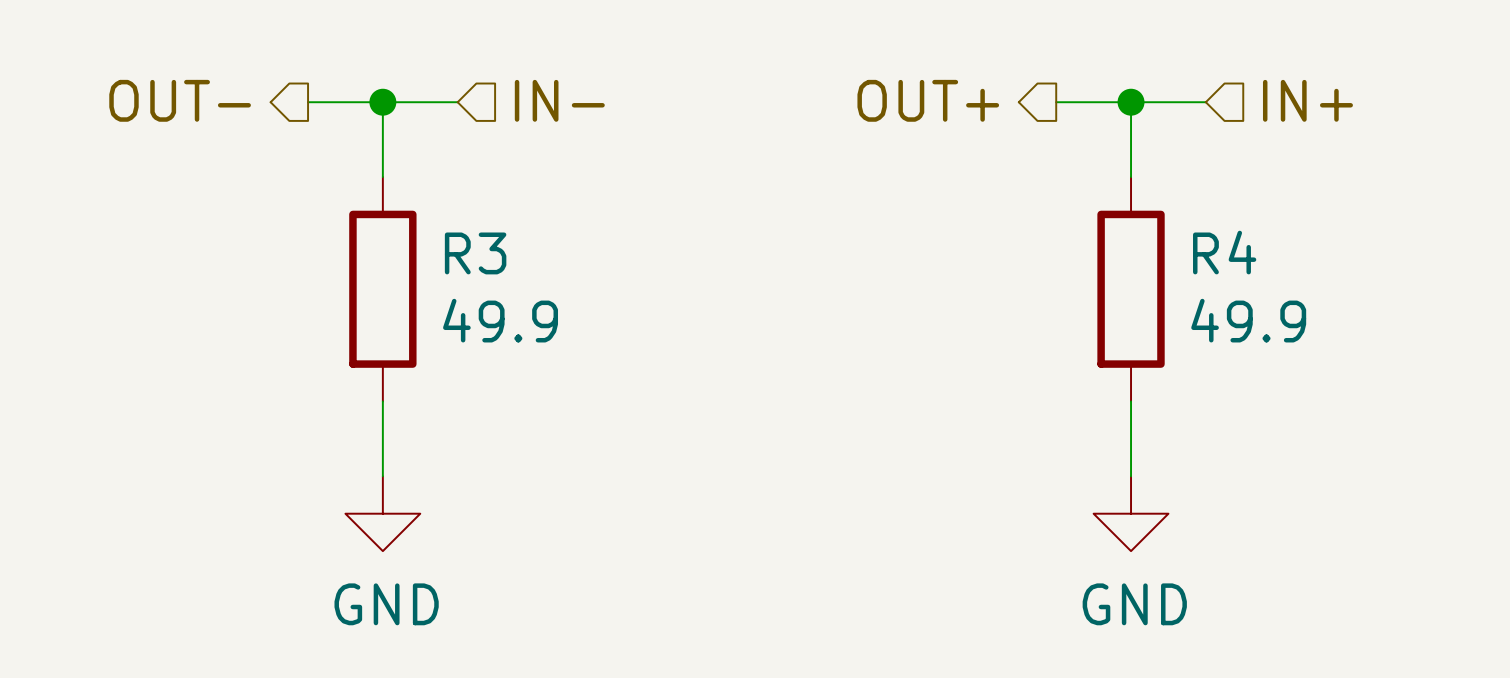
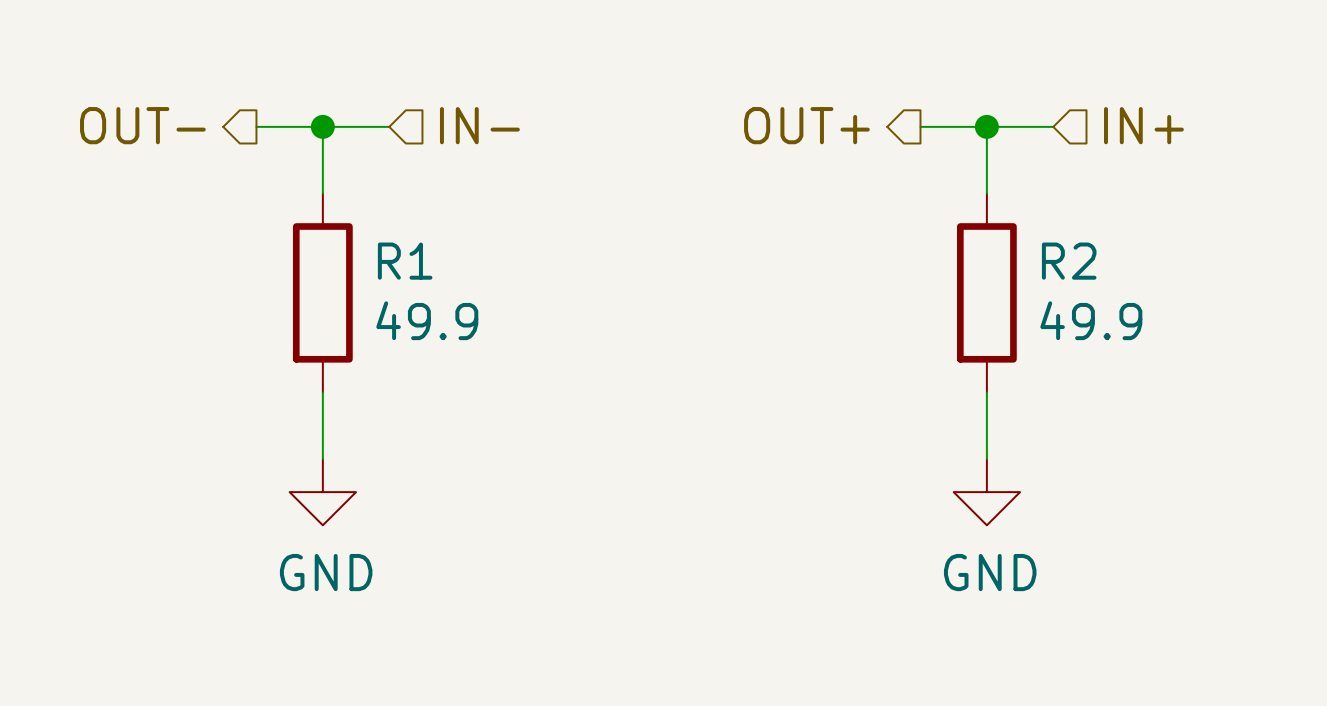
R4 name: R4 (1224, 252) -> R2 (1069, 261)
R3 name: R3 (475, 253) -> R1 (405, 261)

